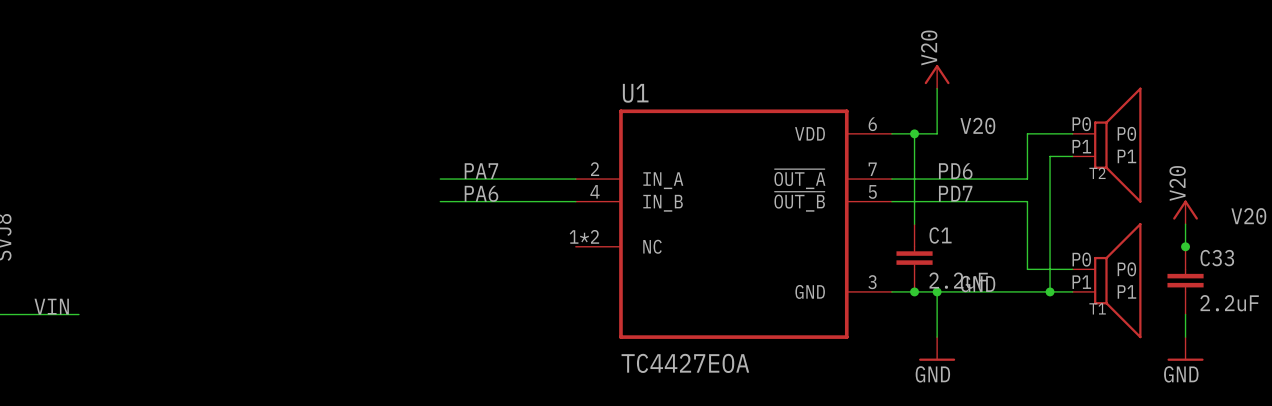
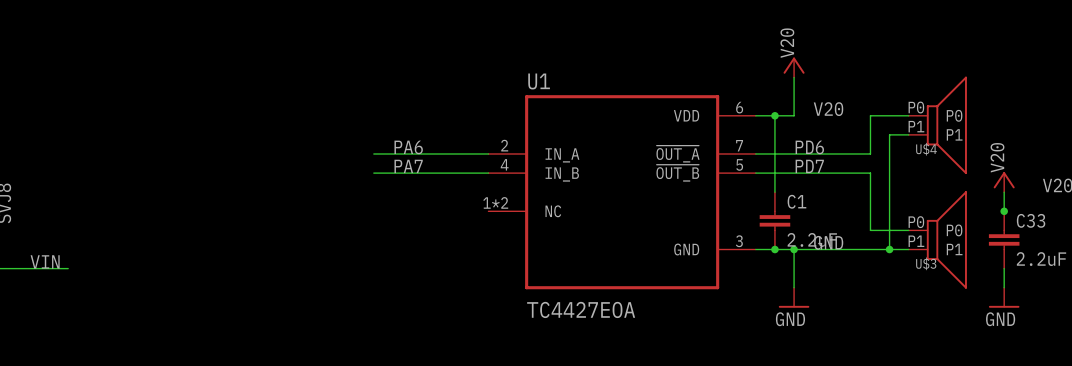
label: PA7 (481, 171) -> PA6 (408, 147)
T2 name: T2 (1097, 173) -> U$4 (926, 149)
label: PA6 (481, 193) -> PA7 (408, 166)
T1 name: T1 (1097, 308) -> U$3 (926, 263)

